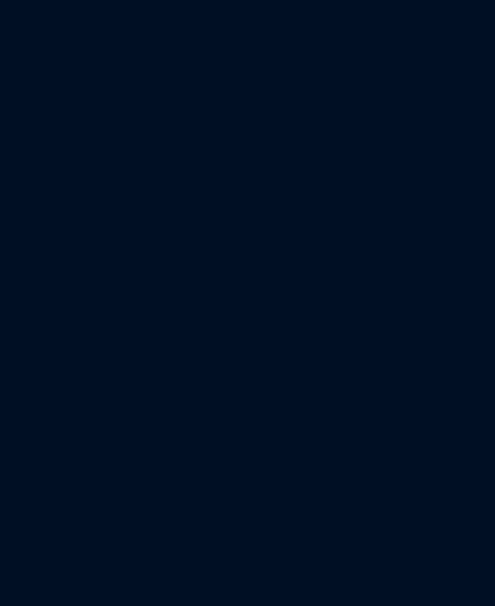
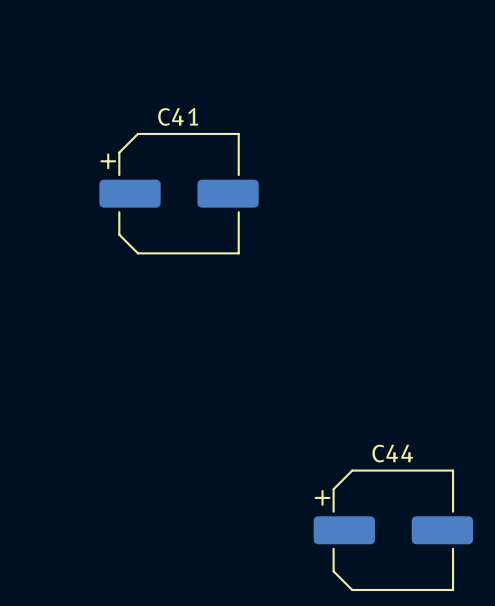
C41: none -> (179, 193)
C44: none -> (393, 530)

